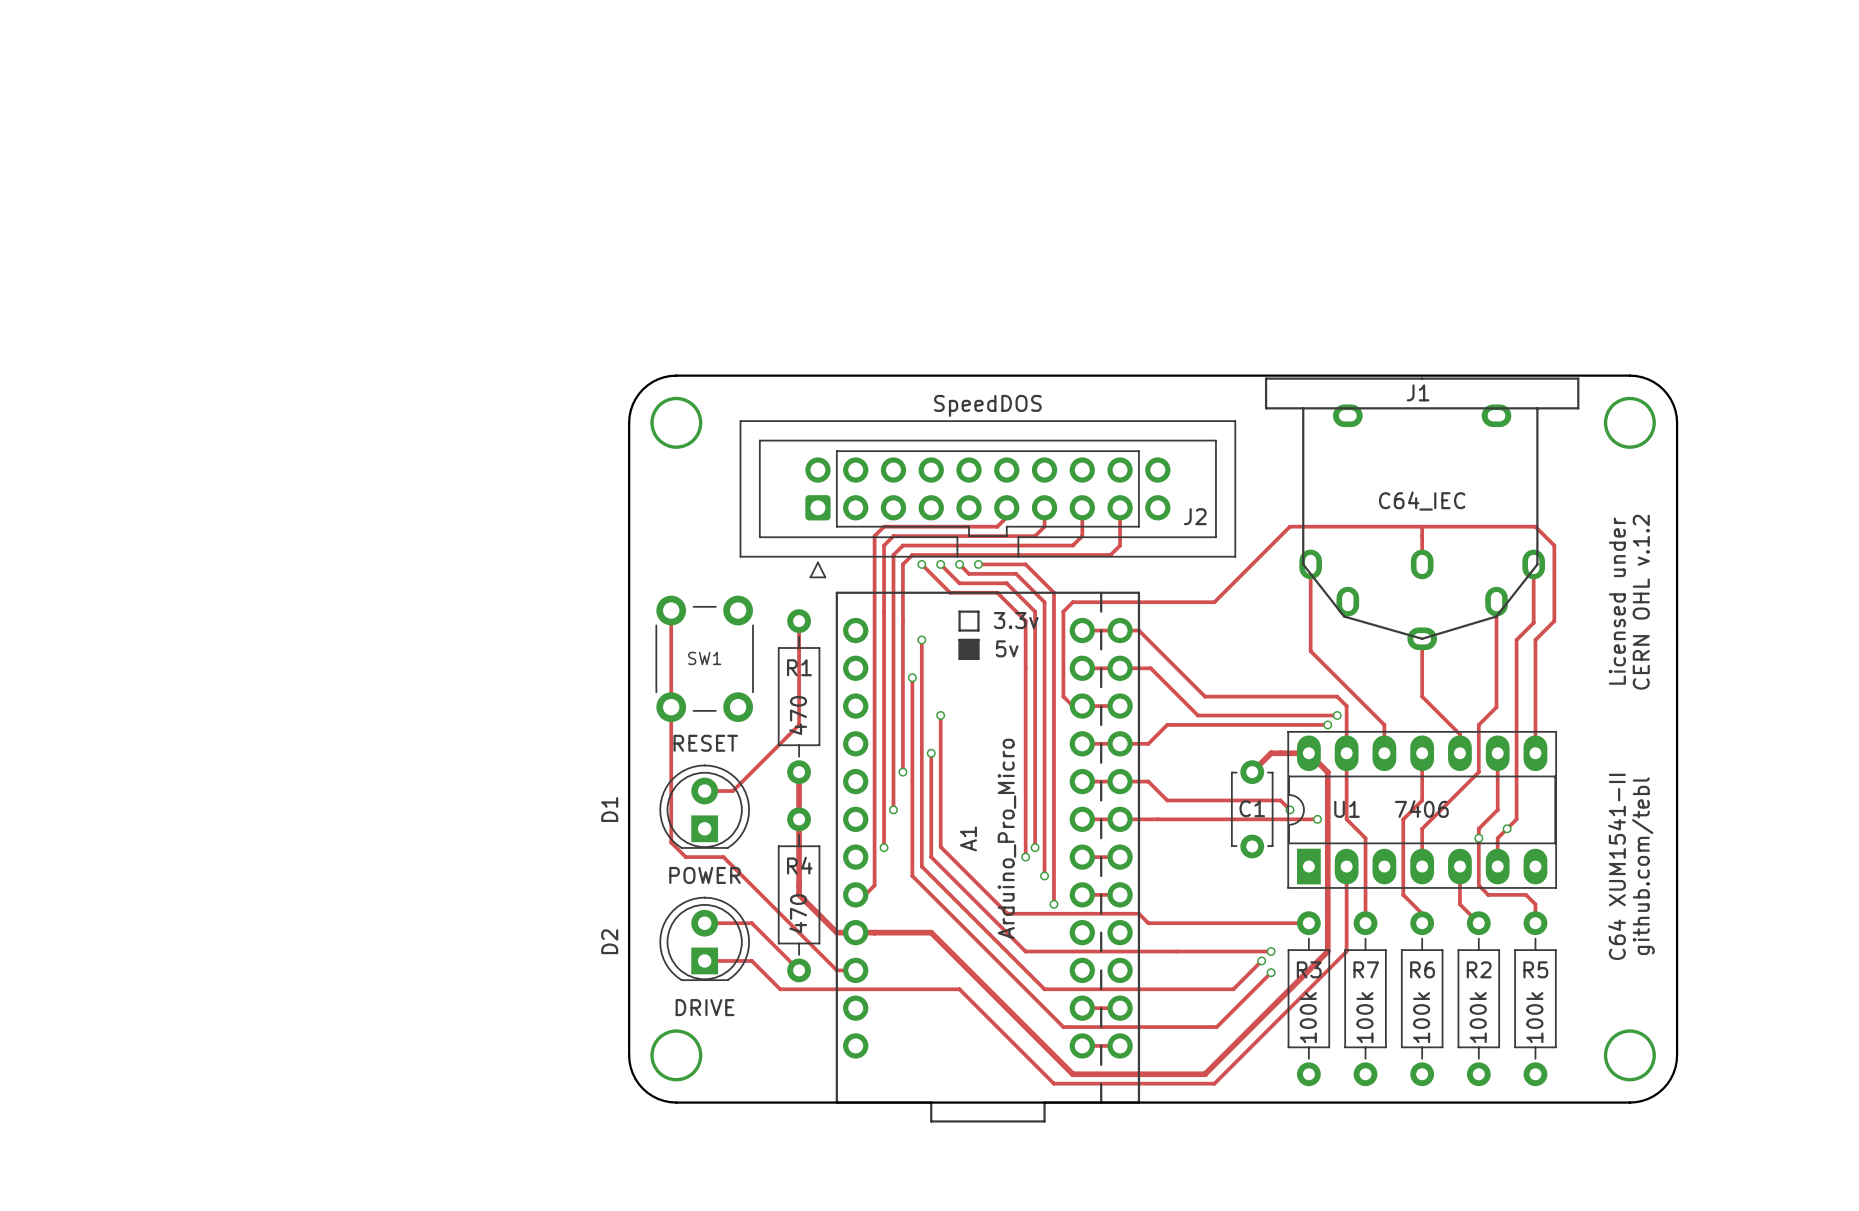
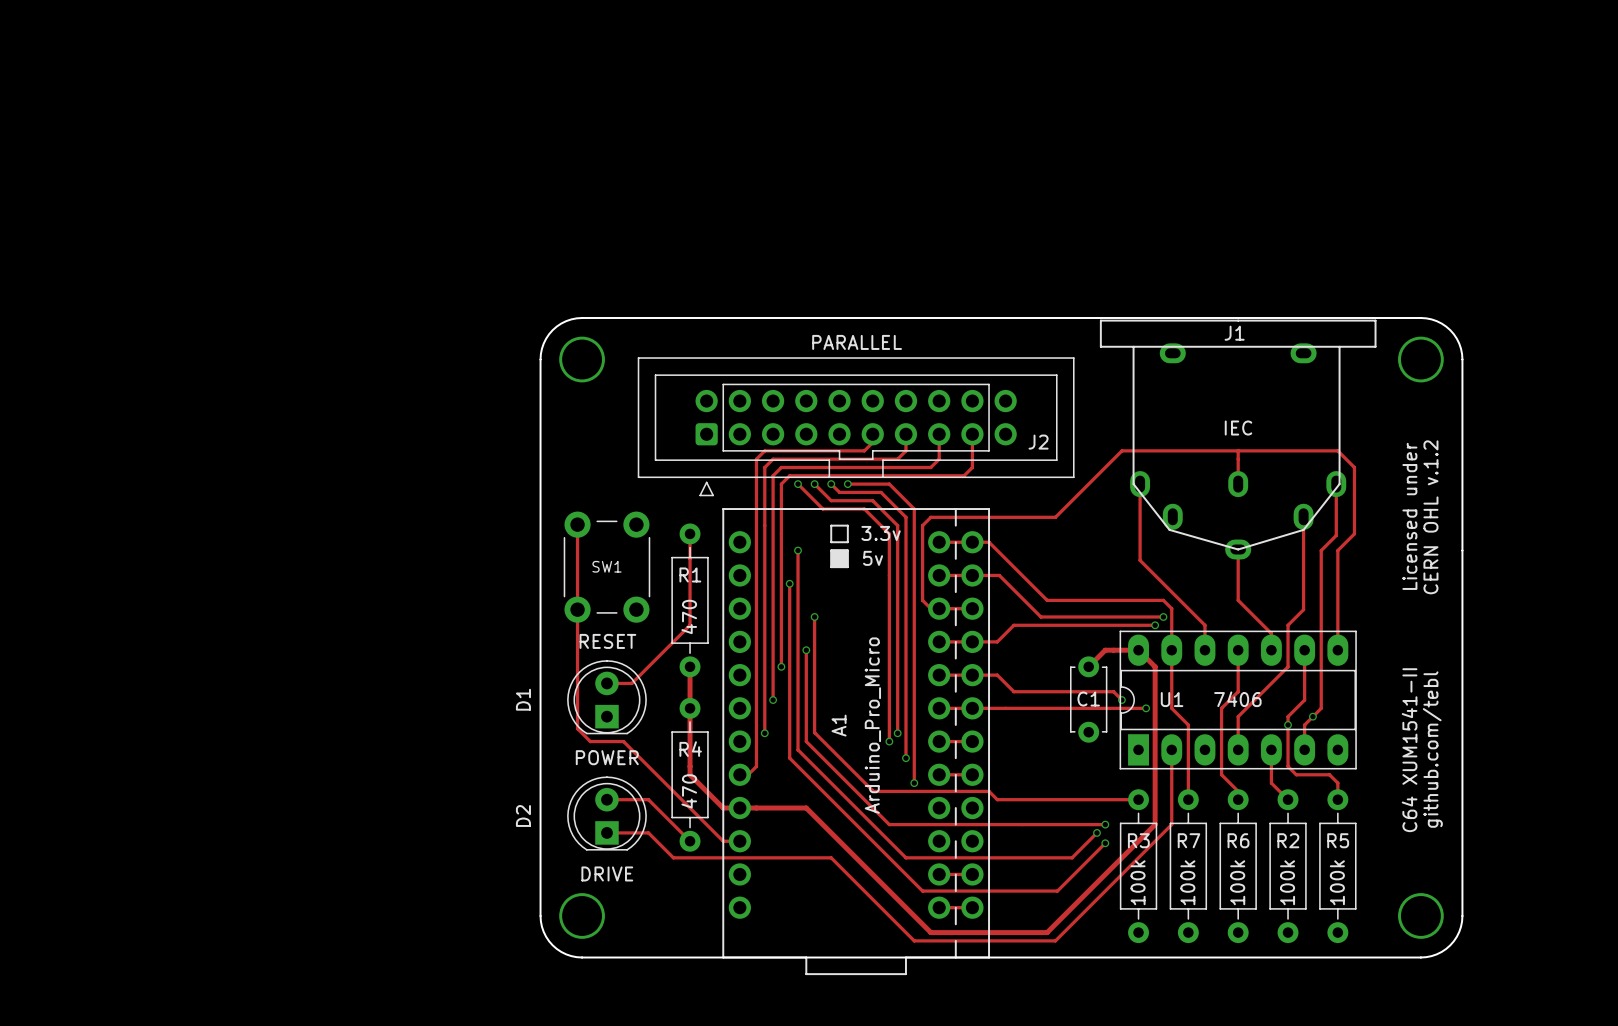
J2 value: SpeedDOS (987, 405) -> PARALLEL (857, 342)
J1 value: C64_IEC (1422, 501) -> IEC (1238, 428)

